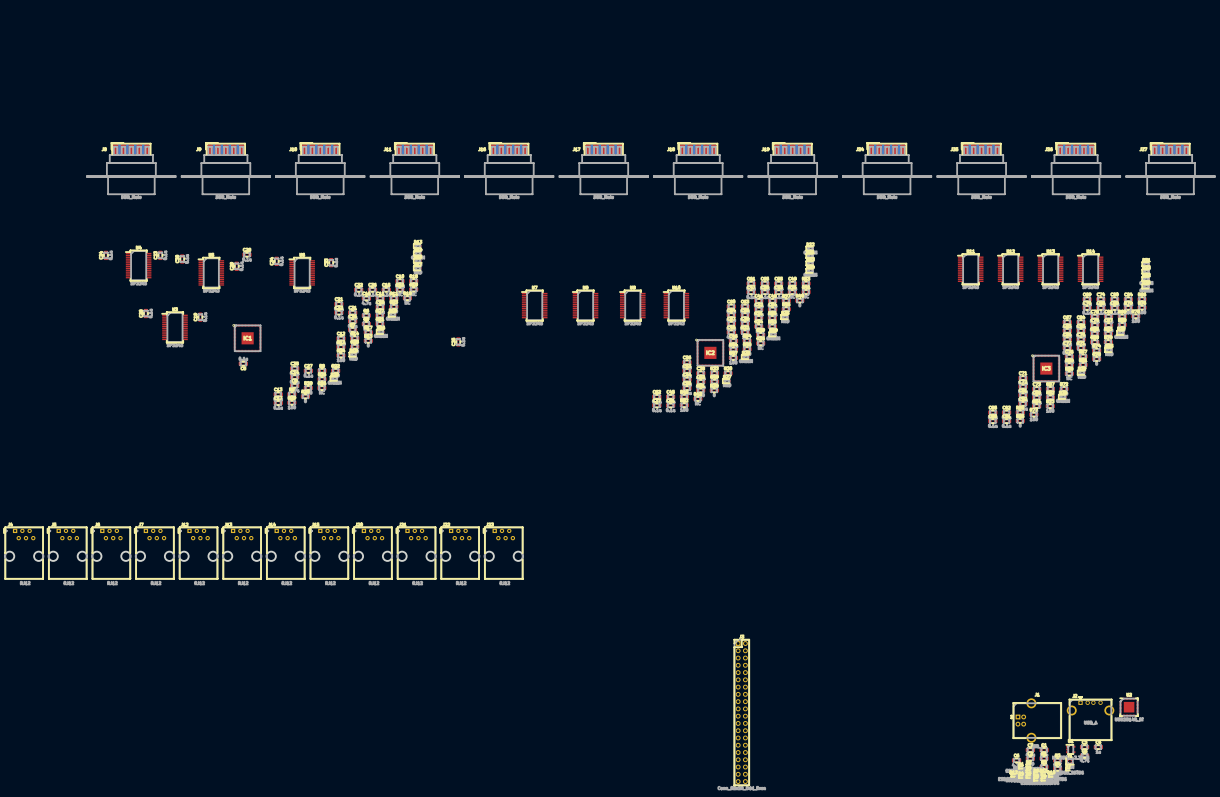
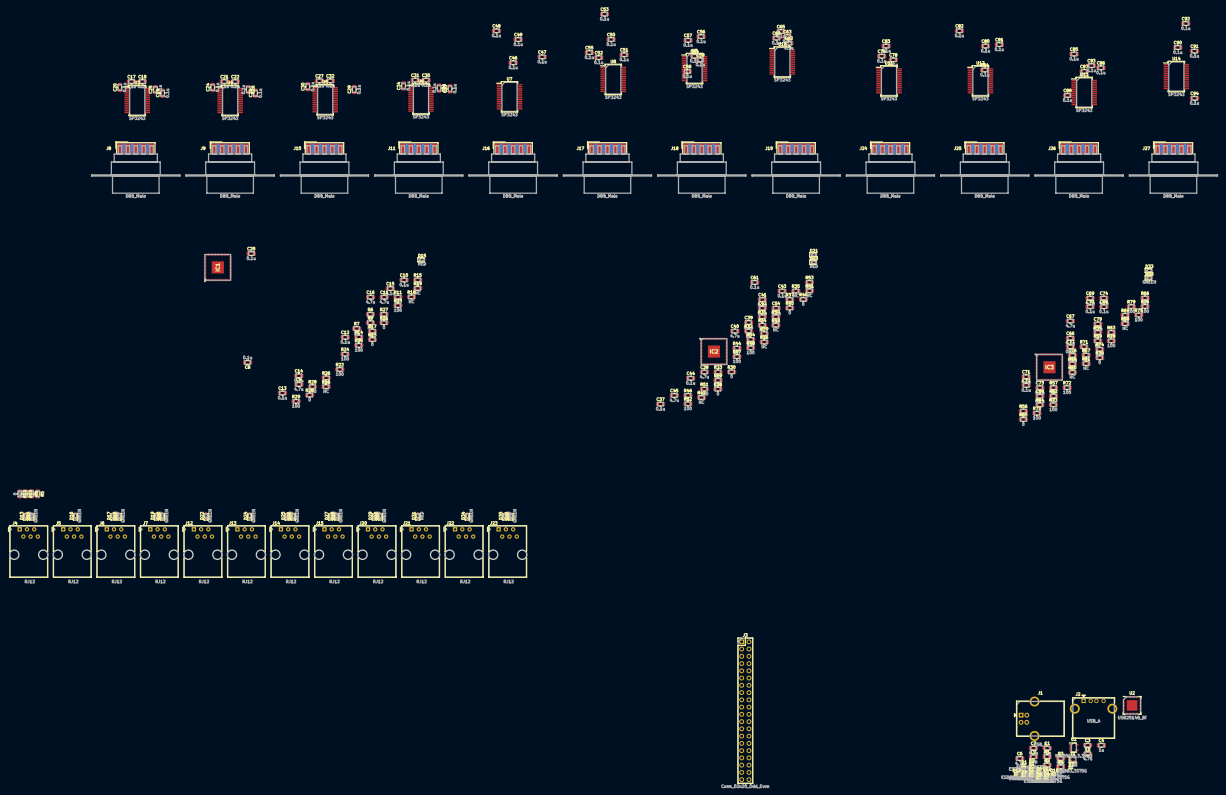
part rotation: 0° (417, 246) -> 90° counterclockwise (25, 516)
part position: (417, 246) -> (25, 516)
part rotation: 0° (809, 248) -> 90° counterclockwise (206, 516)
part position: (809, 248) -> (206, 516)
part rotation: 0° (417, 253) -> 90° counterclockwise (31, 516)
part position: (417, 253) -> (31, 516)
part position: (105, 255) -> (212, 87)
part position: (160, 255) -> (255, 93)
part position: (182, 259) -> (307, 86)
part position: (276, 261) -> (403, 85)
part position: (331, 262) -> (449, 88)
part rotation: 0° (1145, 264) -> 90° counterclockwise (417, 516)
part position: (1145, 264) -> (417, 516)
part position: (138, 265) -> (230, 100)
part position: (236, 266) -> (354, 89)
part rotation: 0° (417, 268) -> 90° counterclockwise (113, 516)
part position: (417, 268) -> (113, 516)
part position: (970, 269) -> (888, 80)
part position: (1010, 269) -> (980, 80)
part position: (1050, 269) -> (1084, 92)
part position: (1090, 269) -> (1176, 76)
part rotation: 0° (809, 270) -> 90° counterclockwise (249, 516)
part position: (809, 270) -> (249, 516)
part position: (211, 272) -> (325, 99)
part position: (302, 272) -> (420, 99)
part position: (764, 283) -> (780, 31)
part position: (778, 283) -> (589, 52)
part position: (792, 283) -> (518, 39)
part rotation: 0° (1145, 286) -> 90° counterclockwise (510, 516)
part position: (1145, 286) -> (510, 516)
part position: (358, 289) -> (330, 80)
part rotation: 0° (372, 289) -> 90° clockwise (439, 88)
part position: (372, 289) -> (439, 88)
part rotation: 0° (399, 289) -> 90° clockwise (25, 493)
part position: (399, 289) -> (25, 493)
part position: (751, 292) -> (542, 56)
part position: (764, 292) -> (700, 59)
part position: (1114, 299) -> (1177, 47)
part position: (1128, 299) -> (1194, 98)
part position: (772, 300) -> (496, 30)
part position: (338, 304) -> (224, 81)
part position: (534, 305) -> (509, 96)
part position: (585, 305) -> (613, 79)
part position: (632, 305) -> (694, 68)
part position: (676, 305) -> (782, 62)
part position: (731, 306) -> (776, 38)
part position: (745, 306) -> (787, 36)
part position: (380, 307) -> (142, 81)
part position: (1114, 307) -> (985, 46)
part position: (338, 312) -> (235, 81)
part position: (352, 312) -> (415, 80)
part position: (145, 313) -> (119, 87)
part rotation: 0° (392, 314) -> 90° counterclockwise (118, 516)
part position: (392, 314) -> (118, 516)
part position: (731, 315) -> (694, 56)
part position: (745, 315) -> (687, 71)
part position: (1094, 316) -> (893, 59)
part position: (1108, 316) -> (1100, 67)
part position: (200, 317) -> (162, 93)
part rotation: 0° (784, 317) -> 90° counterclockwise (287, 516)
part position: (784, 317) -> (287, 516)
part rotation: 0° (352, 321) -> 90° clockwise (248, 89)
part position: (352, 321) -> (248, 89)
part position: (1081, 322) -> (984, 69)
part position: (731, 323) -> (688, 40)
part position: (1108, 325) -> (1084, 71)
part position: (174, 327) -> (137, 100)
part position: (1067, 330) -> (886, 46)
part position: (1081, 330) -> (1091, 65)
part rotation: 0° (380, 331) -> 90° counterclockwise (75, 516)
part position: (380, 331) -> (75, 516)
part rotation: 0° (1120, 332) -> 90° counterclockwise (380, 516)
part position: (1120, 332) -> (380, 516)
part rotation: 0° (772, 334) -> 90° counterclockwise (336, 516)
part position: (772, 334) -> (336, 516)
part rotation: 0° (247, 338) -> 90° counterclockwise (217, 267)
part position: (247, 338) -> (217, 267)
part position: (1081, 339) -> (881, 56)
part position: (733, 340) -> (513, 62)
part position: (458, 341) -> (155, 89)
part rotation: 0° (340, 347) -> 90° clockwise (19, 493)
part position: (340, 347) -> (19, 493)
part rotation: 0° (1108, 350) -> 90° counterclockwise (504, 516)
part position: (1108, 350) -> (504, 516)
part rotation: 0° (353, 354) -> 90° counterclockwise (156, 516)
part position: (353, 354) -> (156, 516)
part rotation: 0° (745, 357) -> 90° counterclockwise (293, 516)
part position: (745, 357) -> (293, 516)
part position: (687, 362) -> (701, 36)
part position: (294, 368) -> (426, 80)
part position: (308, 370) -> (319, 80)
part rotation: 0° (322, 370) -> 90° clockwise (31, 493)
part position: (322, 370) -> (31, 493)
part position: (687, 370) -> (604, 14)
part rotation: 0° (1081, 372) -> 90° counterclockwise (374, 516)
part position: (1081, 372) -> (374, 516)
part rotation: 0° (334, 378) -> 90° counterclockwise (162, 516)
part position: (334, 378) -> (162, 516)
part position: (700, 381) -> (598, 57)
part rotation: 0° (726, 381) -> 90° counterclockwise (330, 516)
part position: (726, 381) -> (330, 516)
part position: (687, 388) -> (611, 39)
part rotation: 0° (291, 394) -> 90° clockwise (37, 493)
part position: (291, 394) -> (37, 493)
part position: (1022, 395) -> (999, 44)
part position: (656, 396) -> (788, 43)
part rotation: 0° (1062, 396) -> 90° counterclockwise (467, 516)
part position: (1062, 396) -> (467, 516)
part position: (278, 402) -> (131, 81)
part position: (1022, 403) -> (1185, 23)
part position: (670, 405) -> (624, 54)
part position: (992, 412) -> (1074, 54)
part position: (1006, 412) -> (959, 30)
part position: (992, 421) -> (1067, 95)
part position: (1006, 421) -> (1194, 51)

